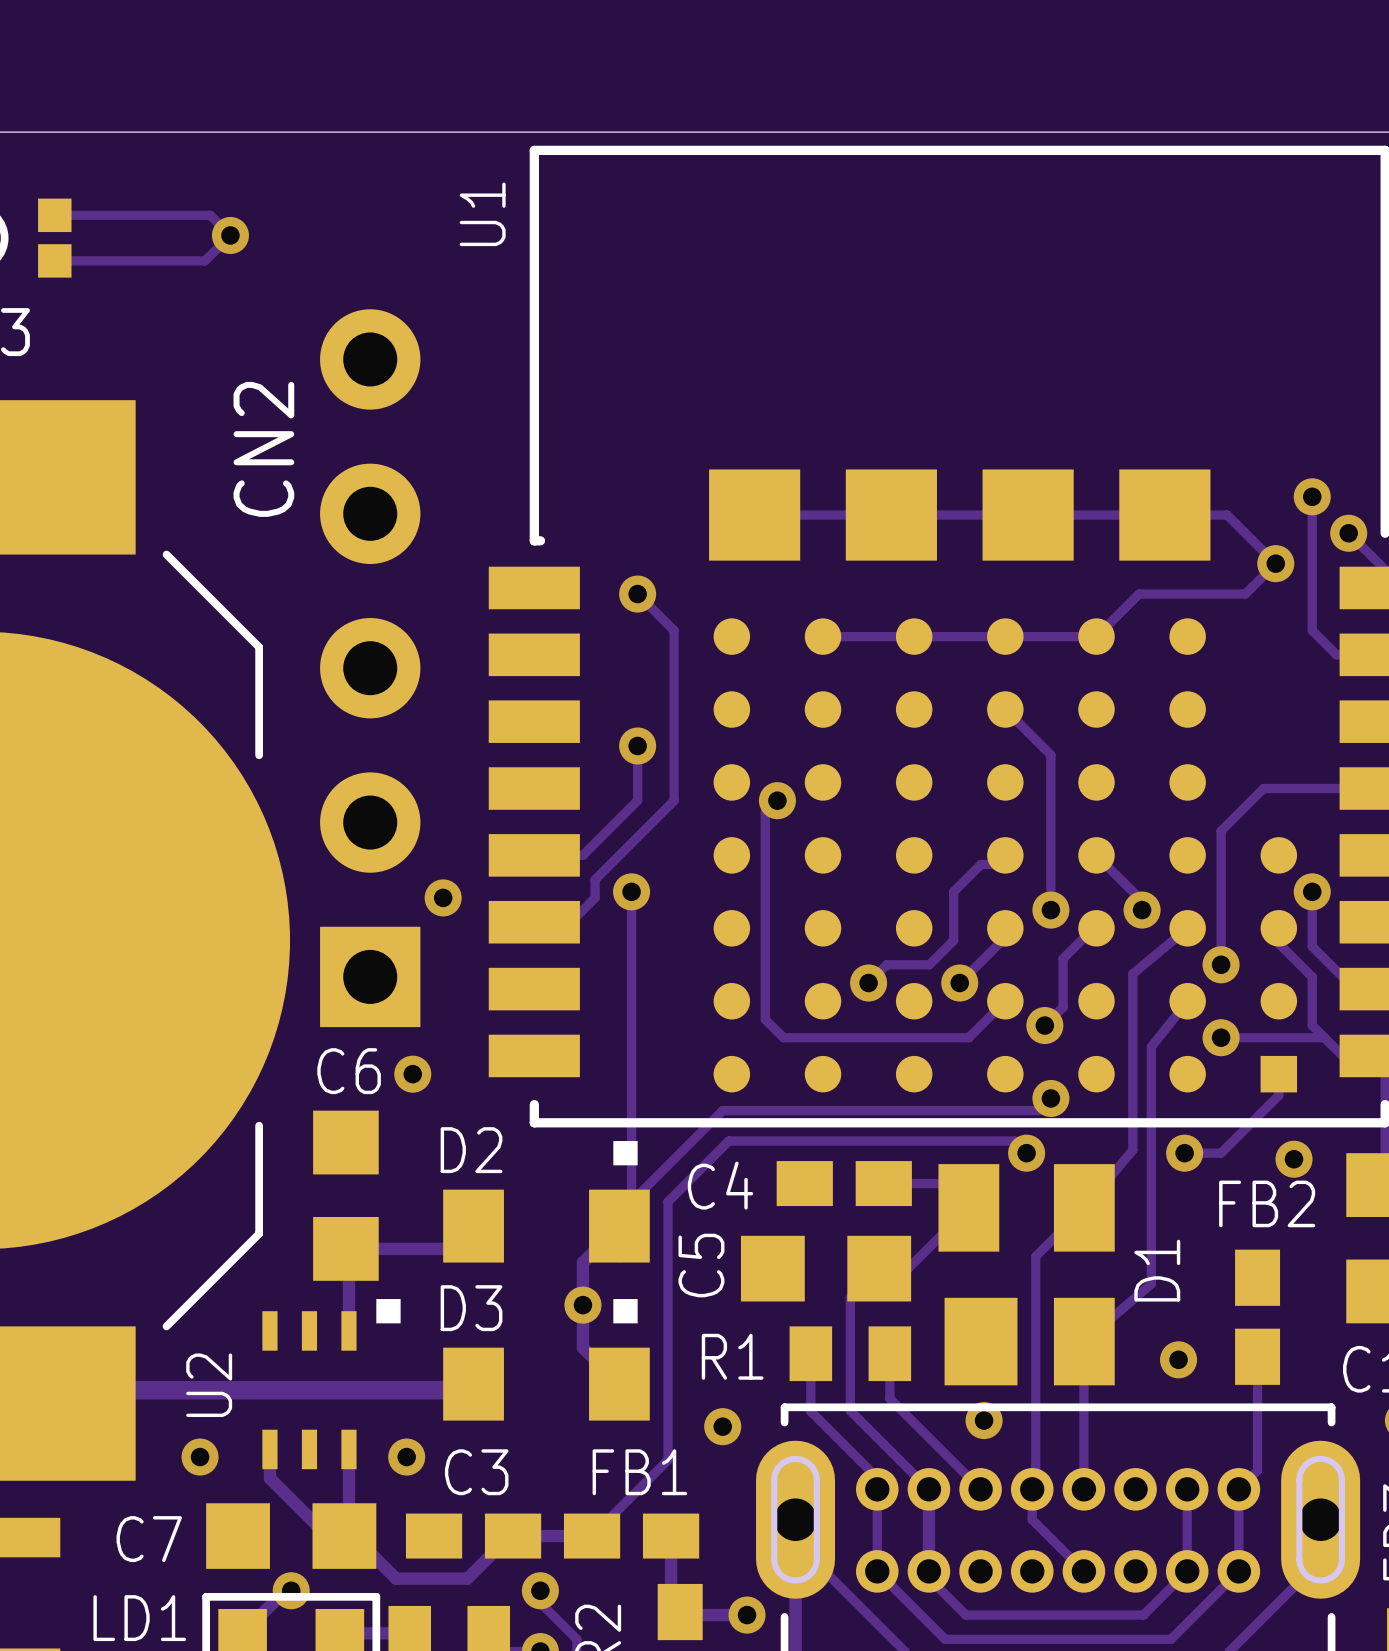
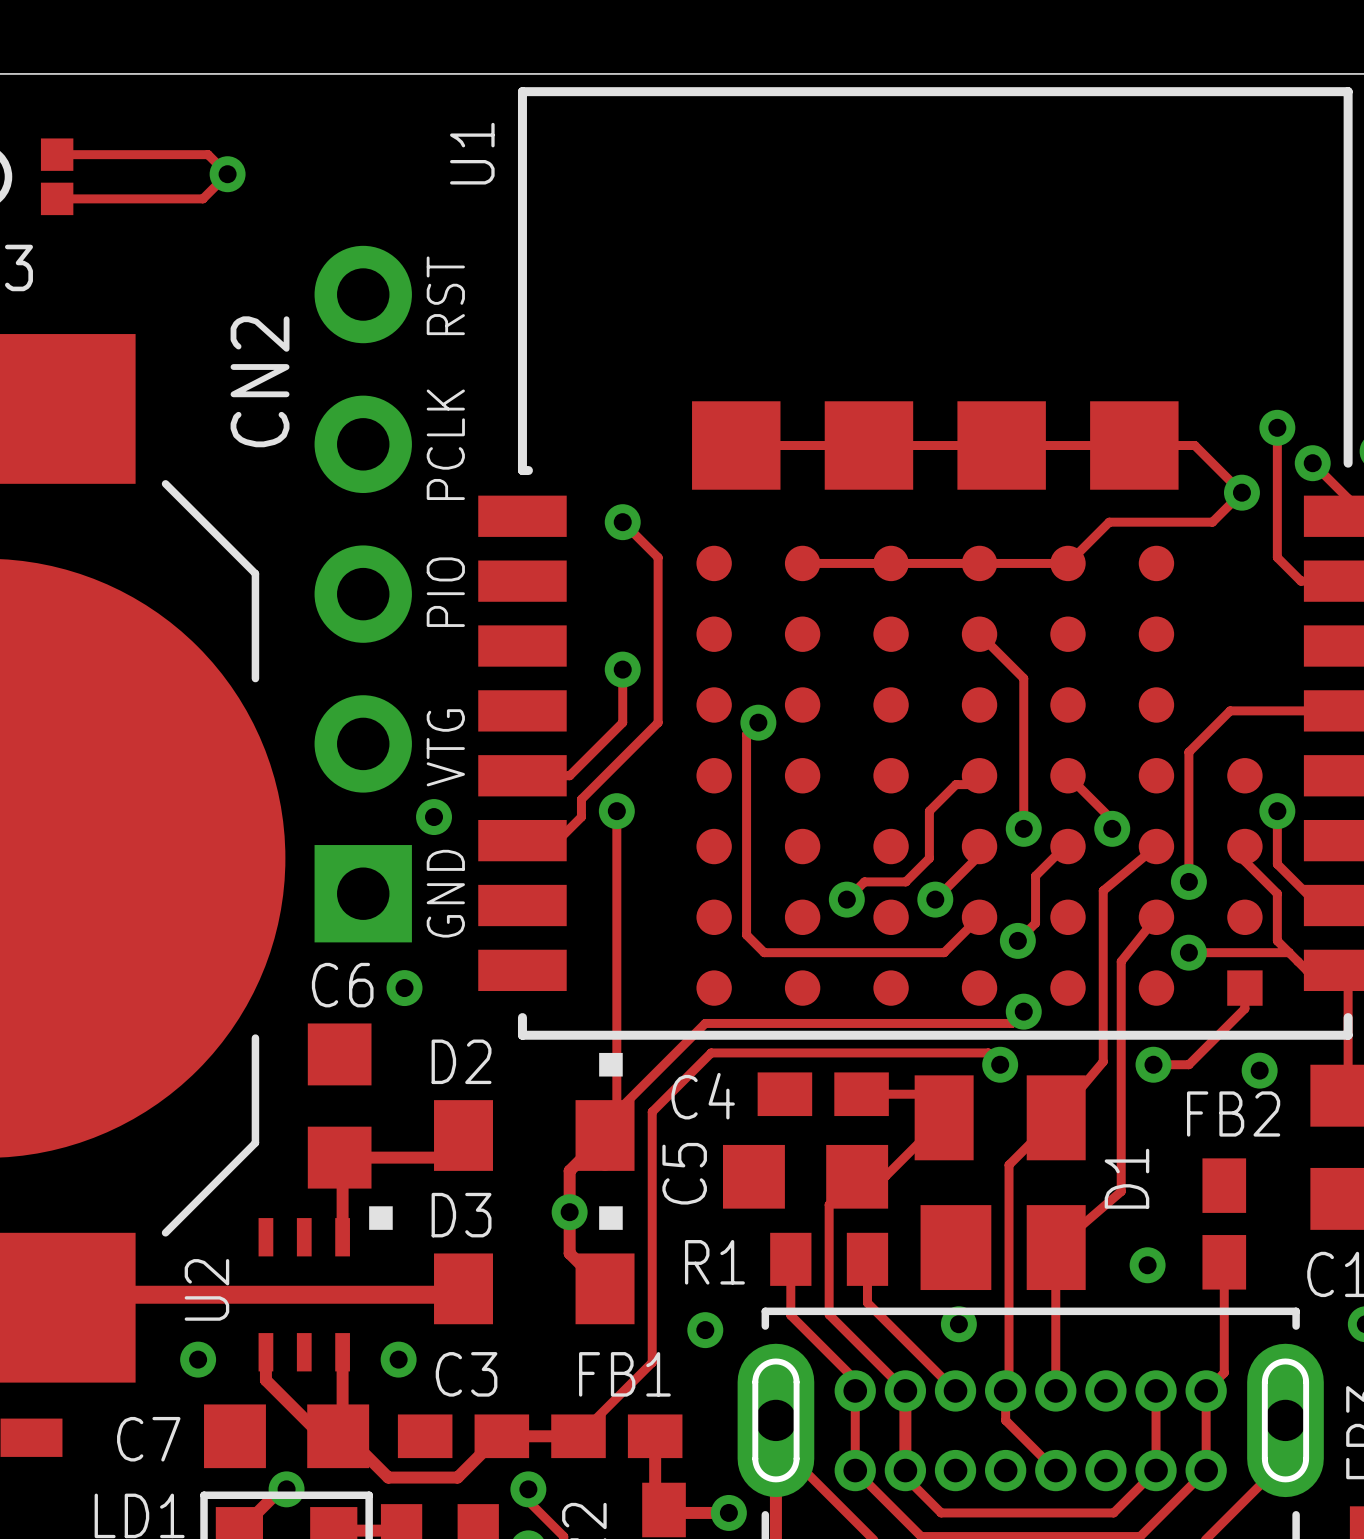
text: none -> RST (445, 295)
text: none -> PCLK (445, 444)
text: none -> PIO (445, 592)
text: none -> VTG (445, 747)
text: none -> GND (445, 893)

